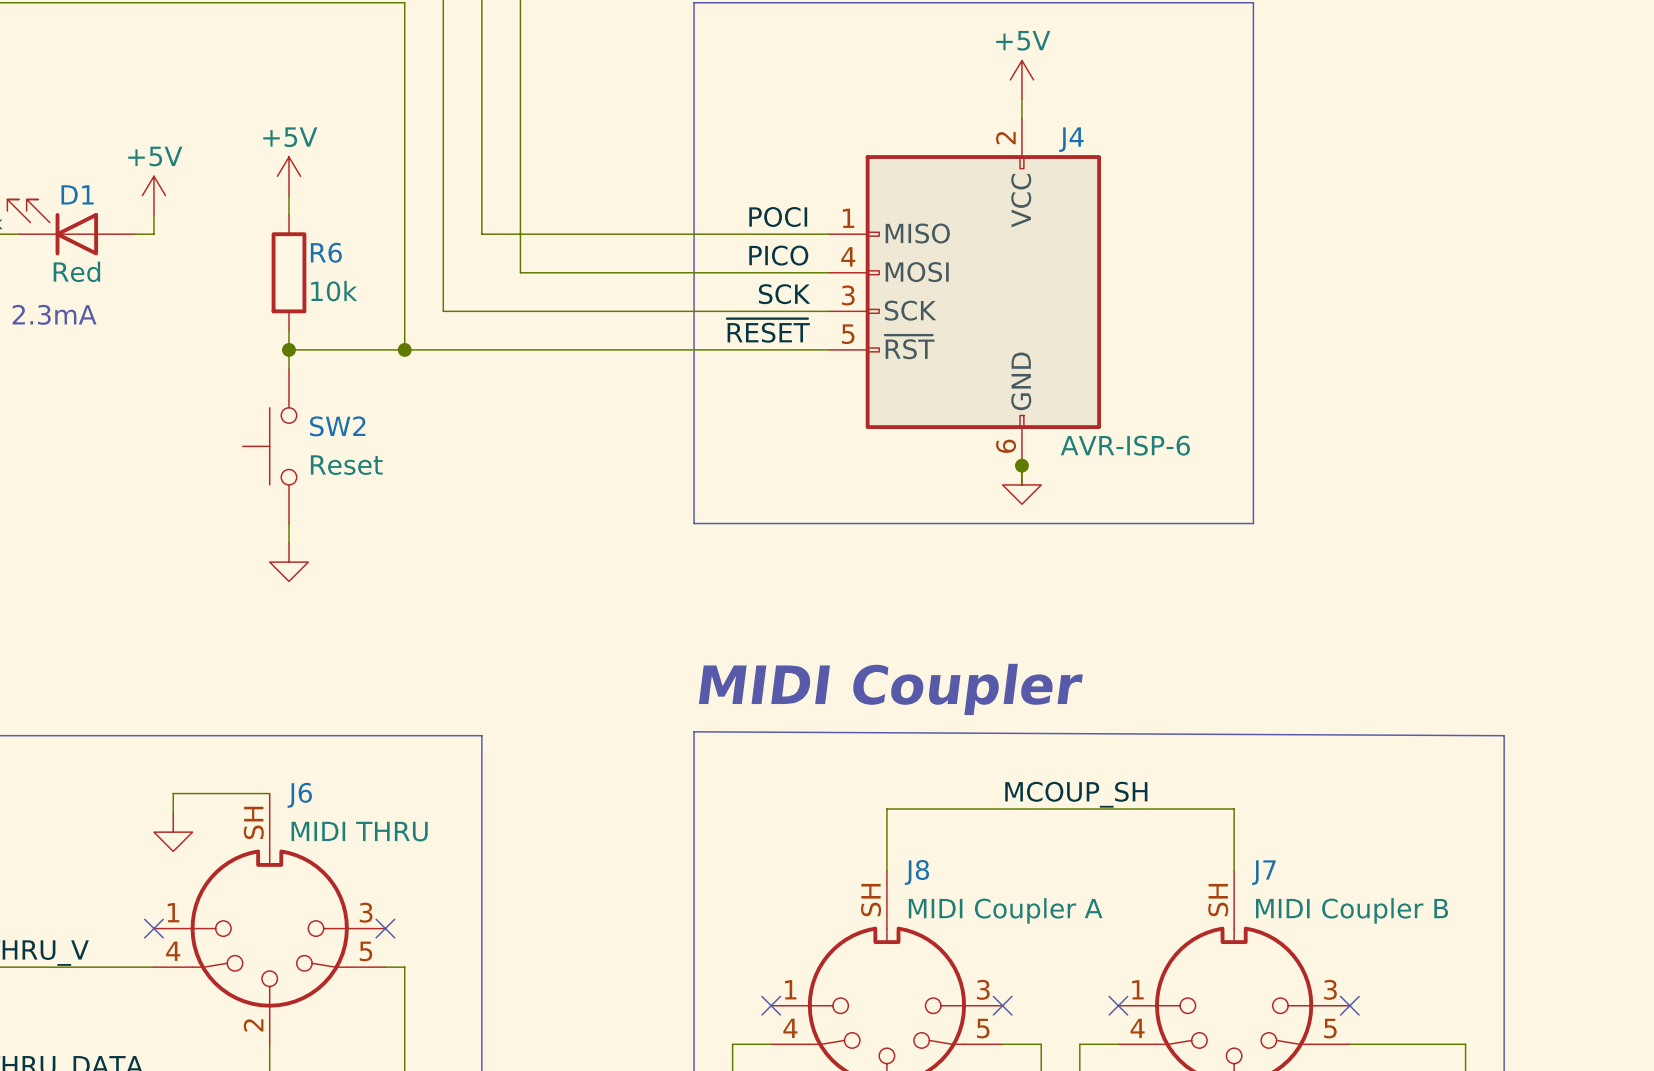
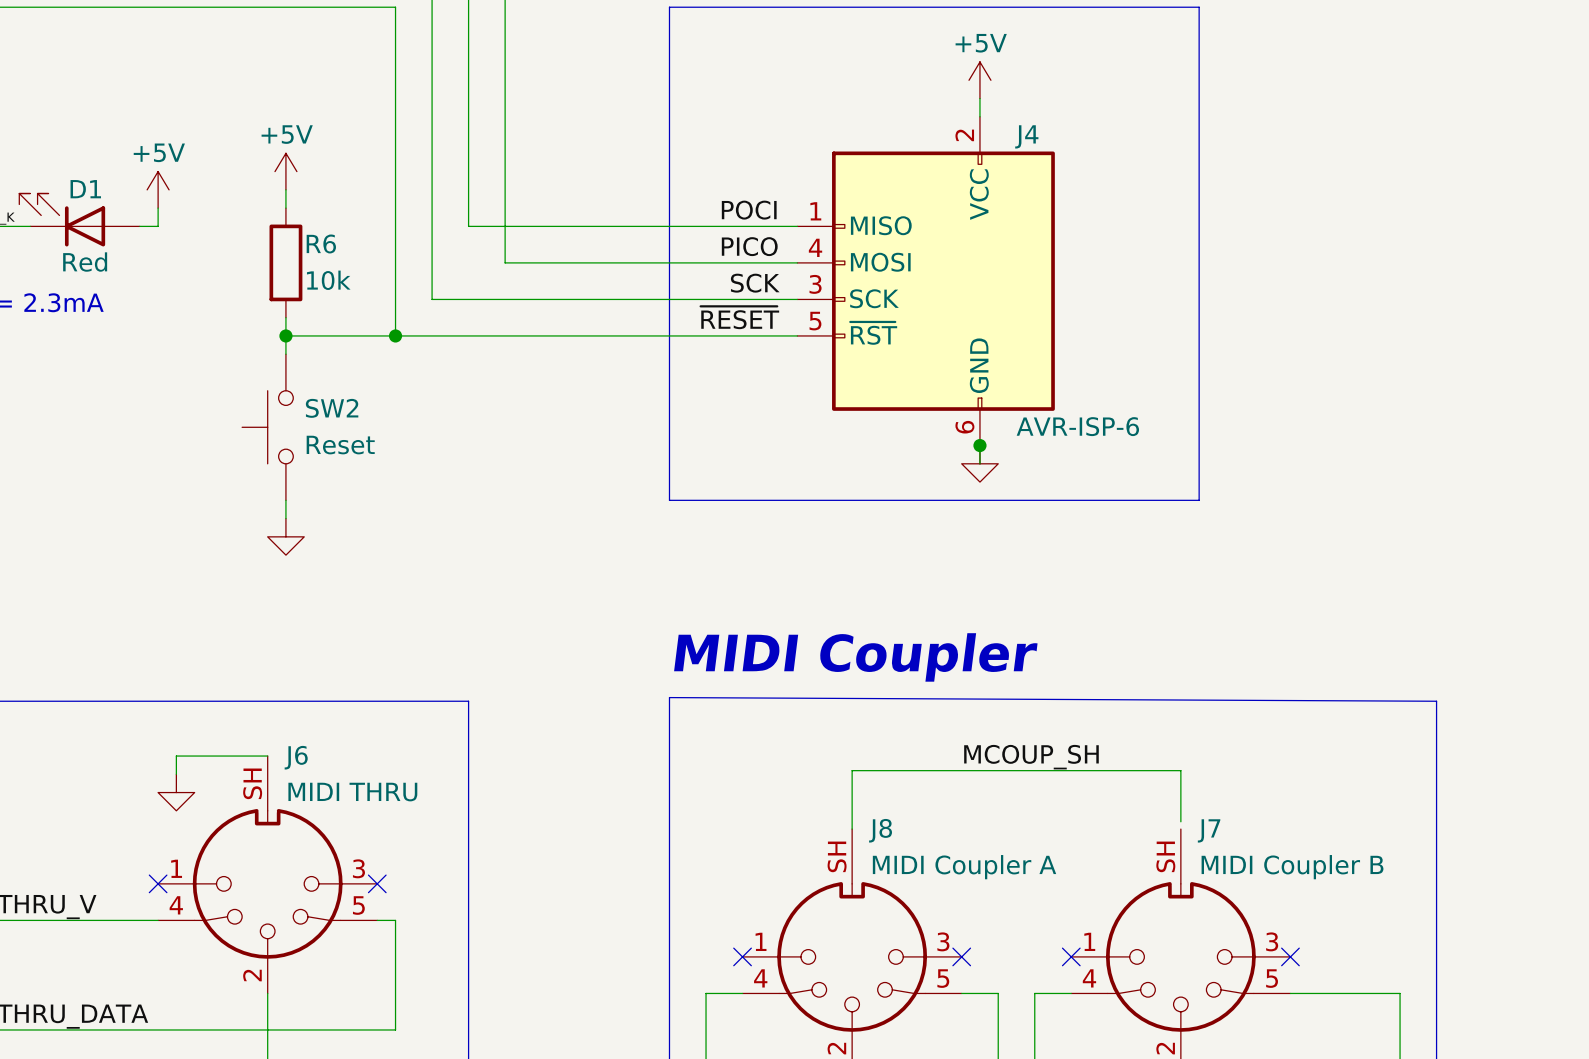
wire: (1234, 863) (1234, 870) -> none

